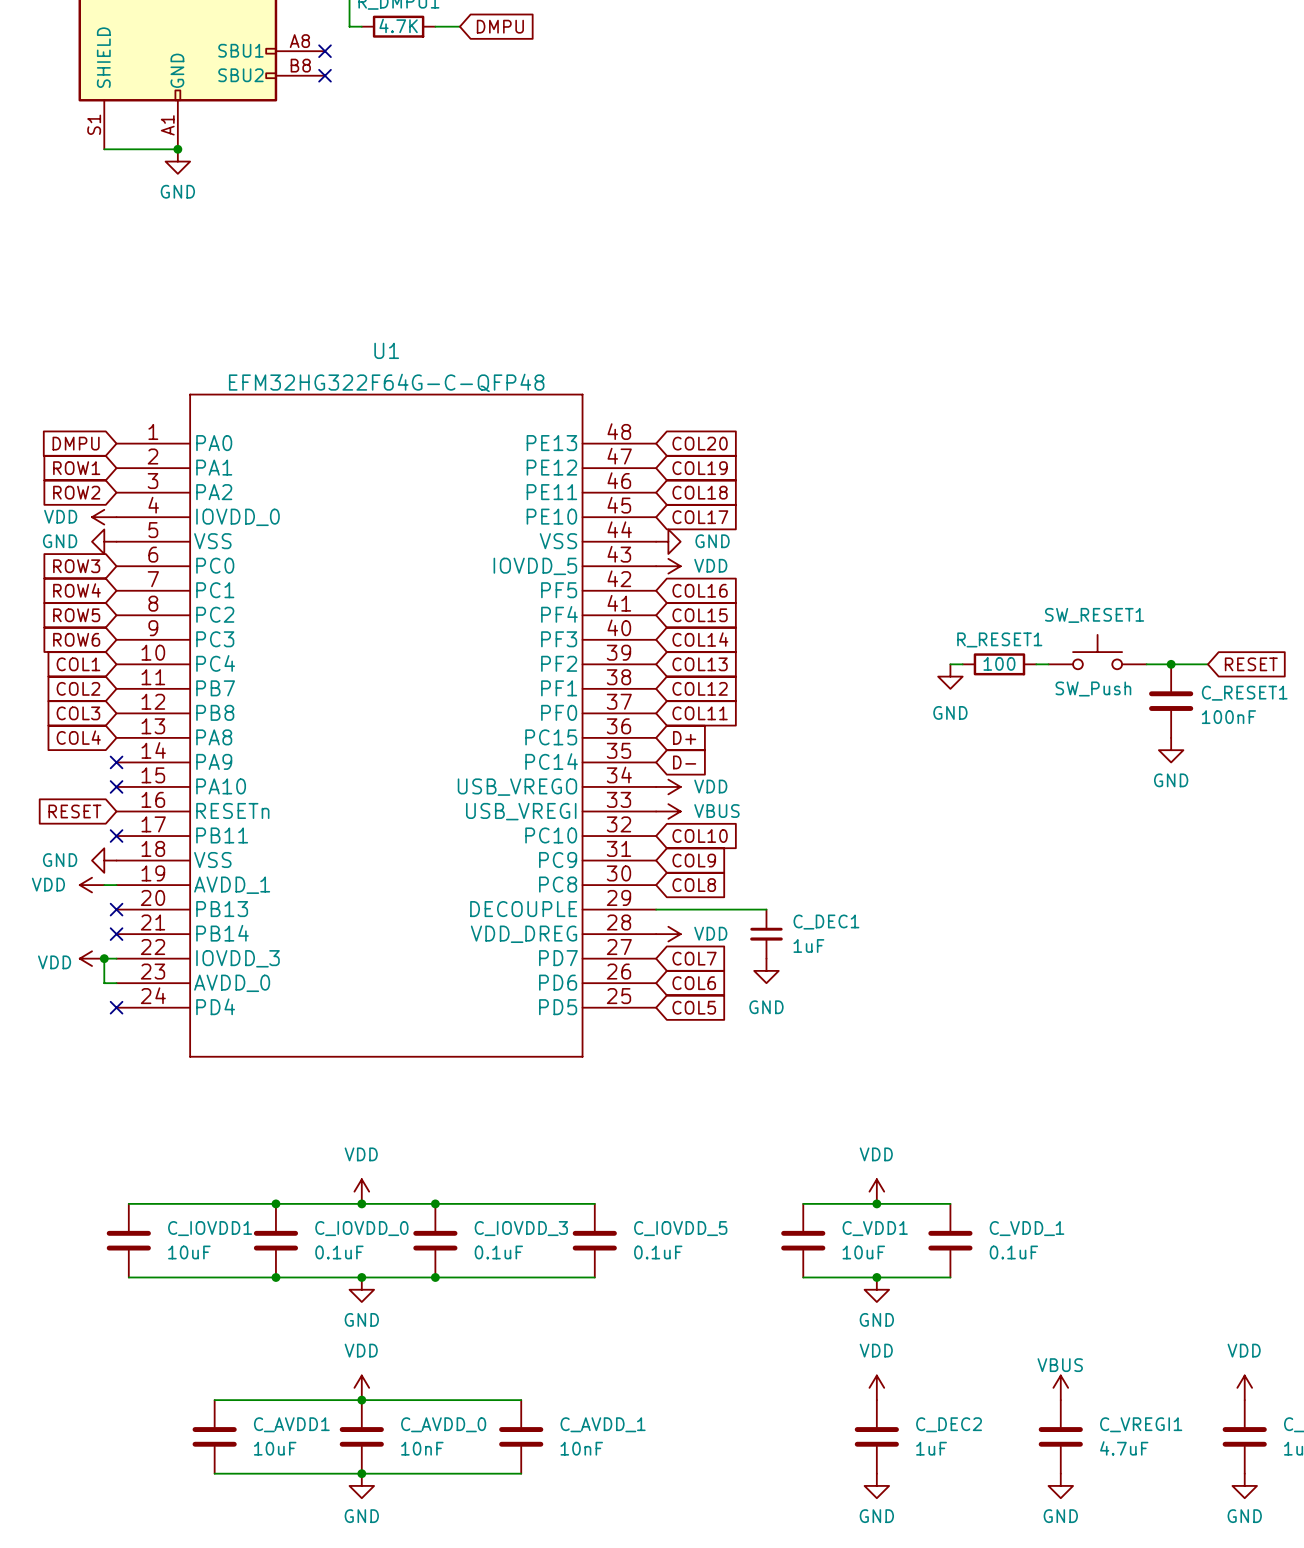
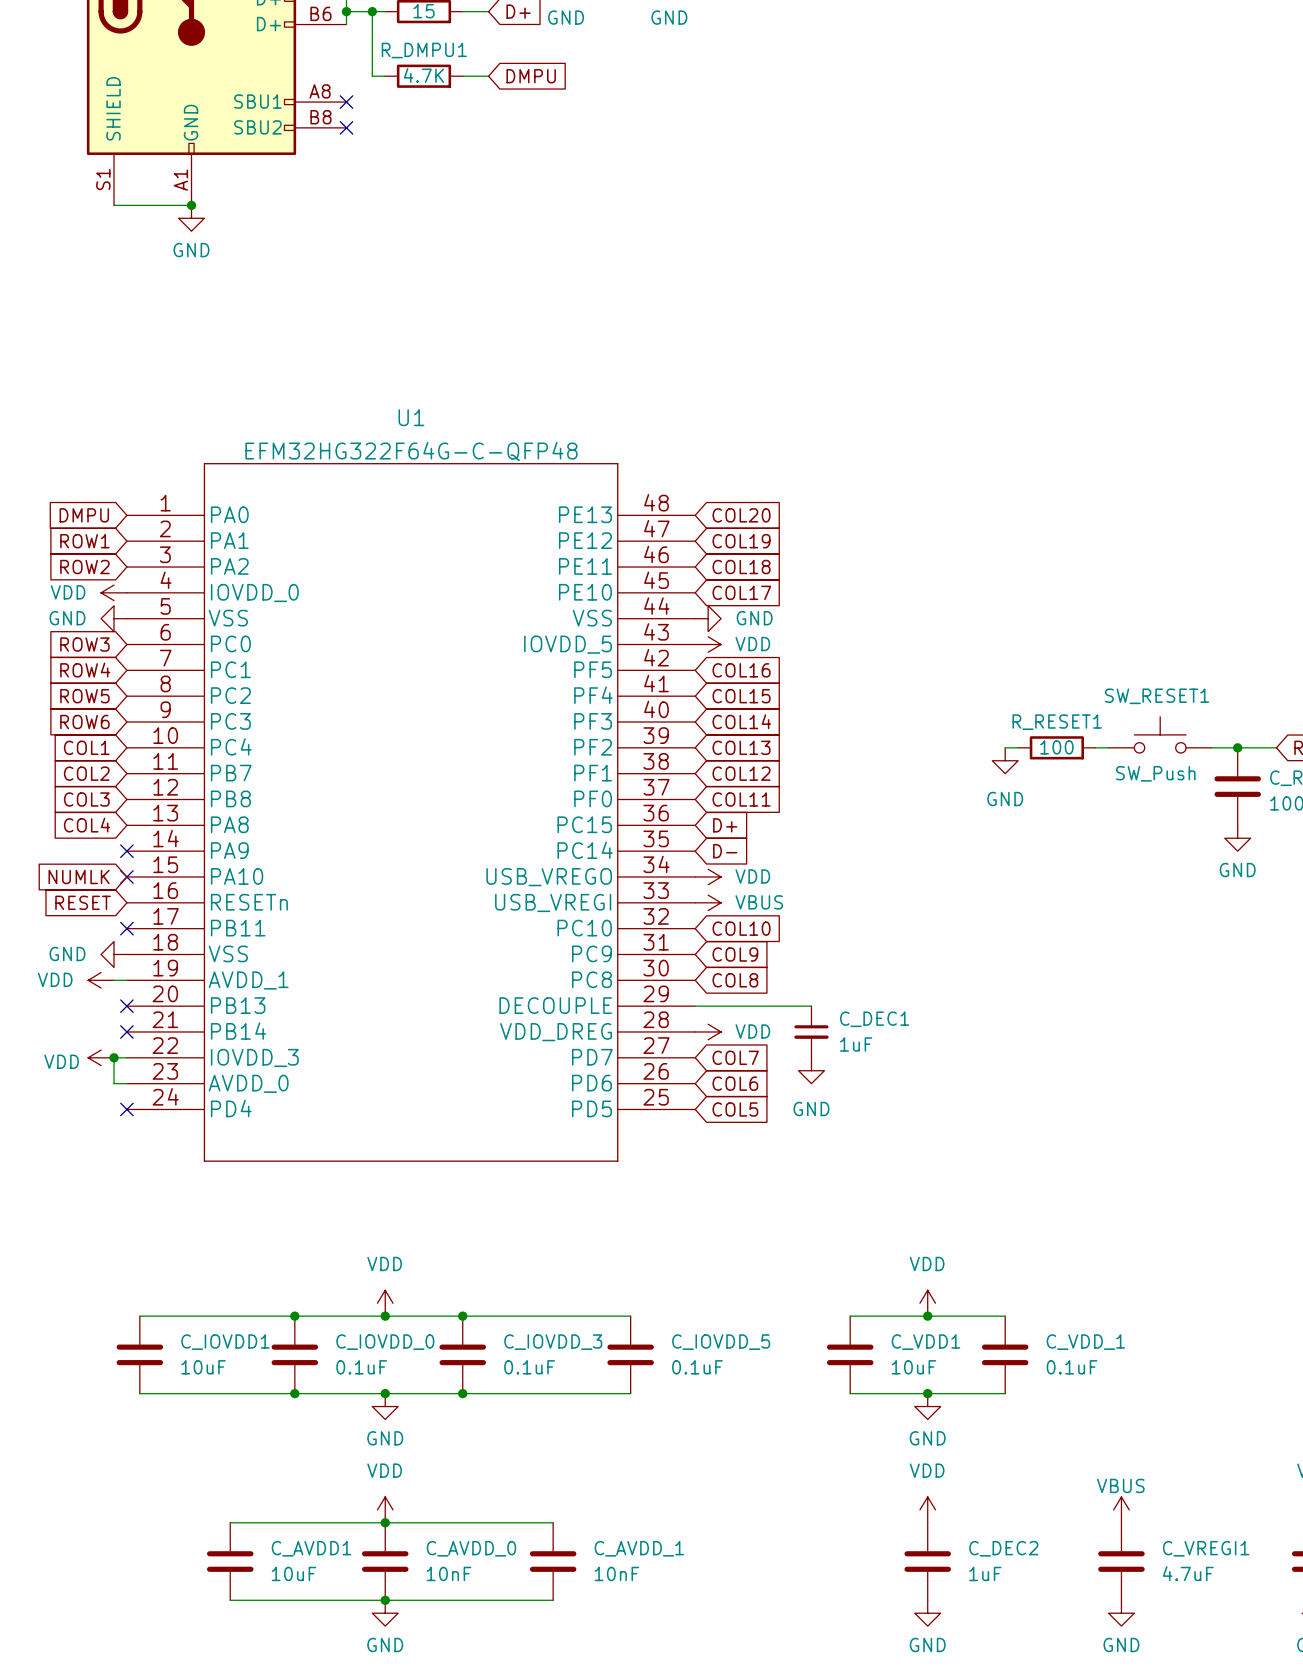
global label: none -> NUMLK (79, 877)

